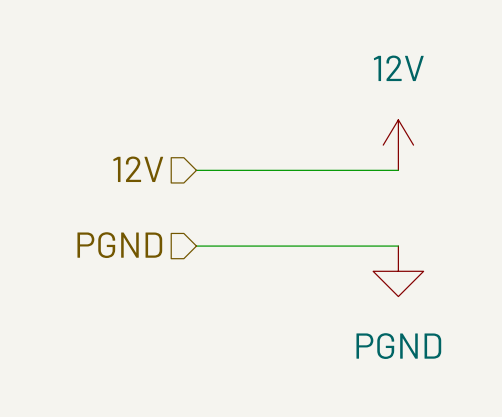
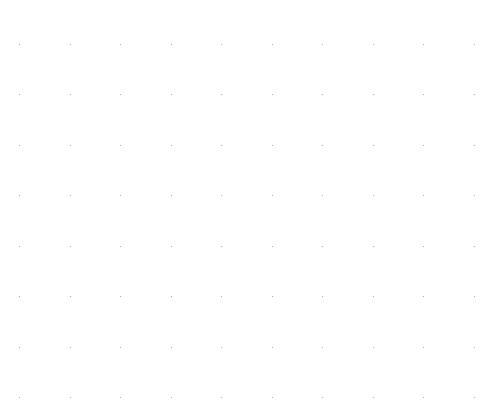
power symbol: 12V (398, 145) -> none
hierarchical label: 12V (138, 169) -> none
wire: (196, 170) (398, 170) -> none
hierarchical label: PGND (119, 245) -> none
wire: (196, 246) (398, 246) -> none
power symbol: PGND (398, 271) -> none

